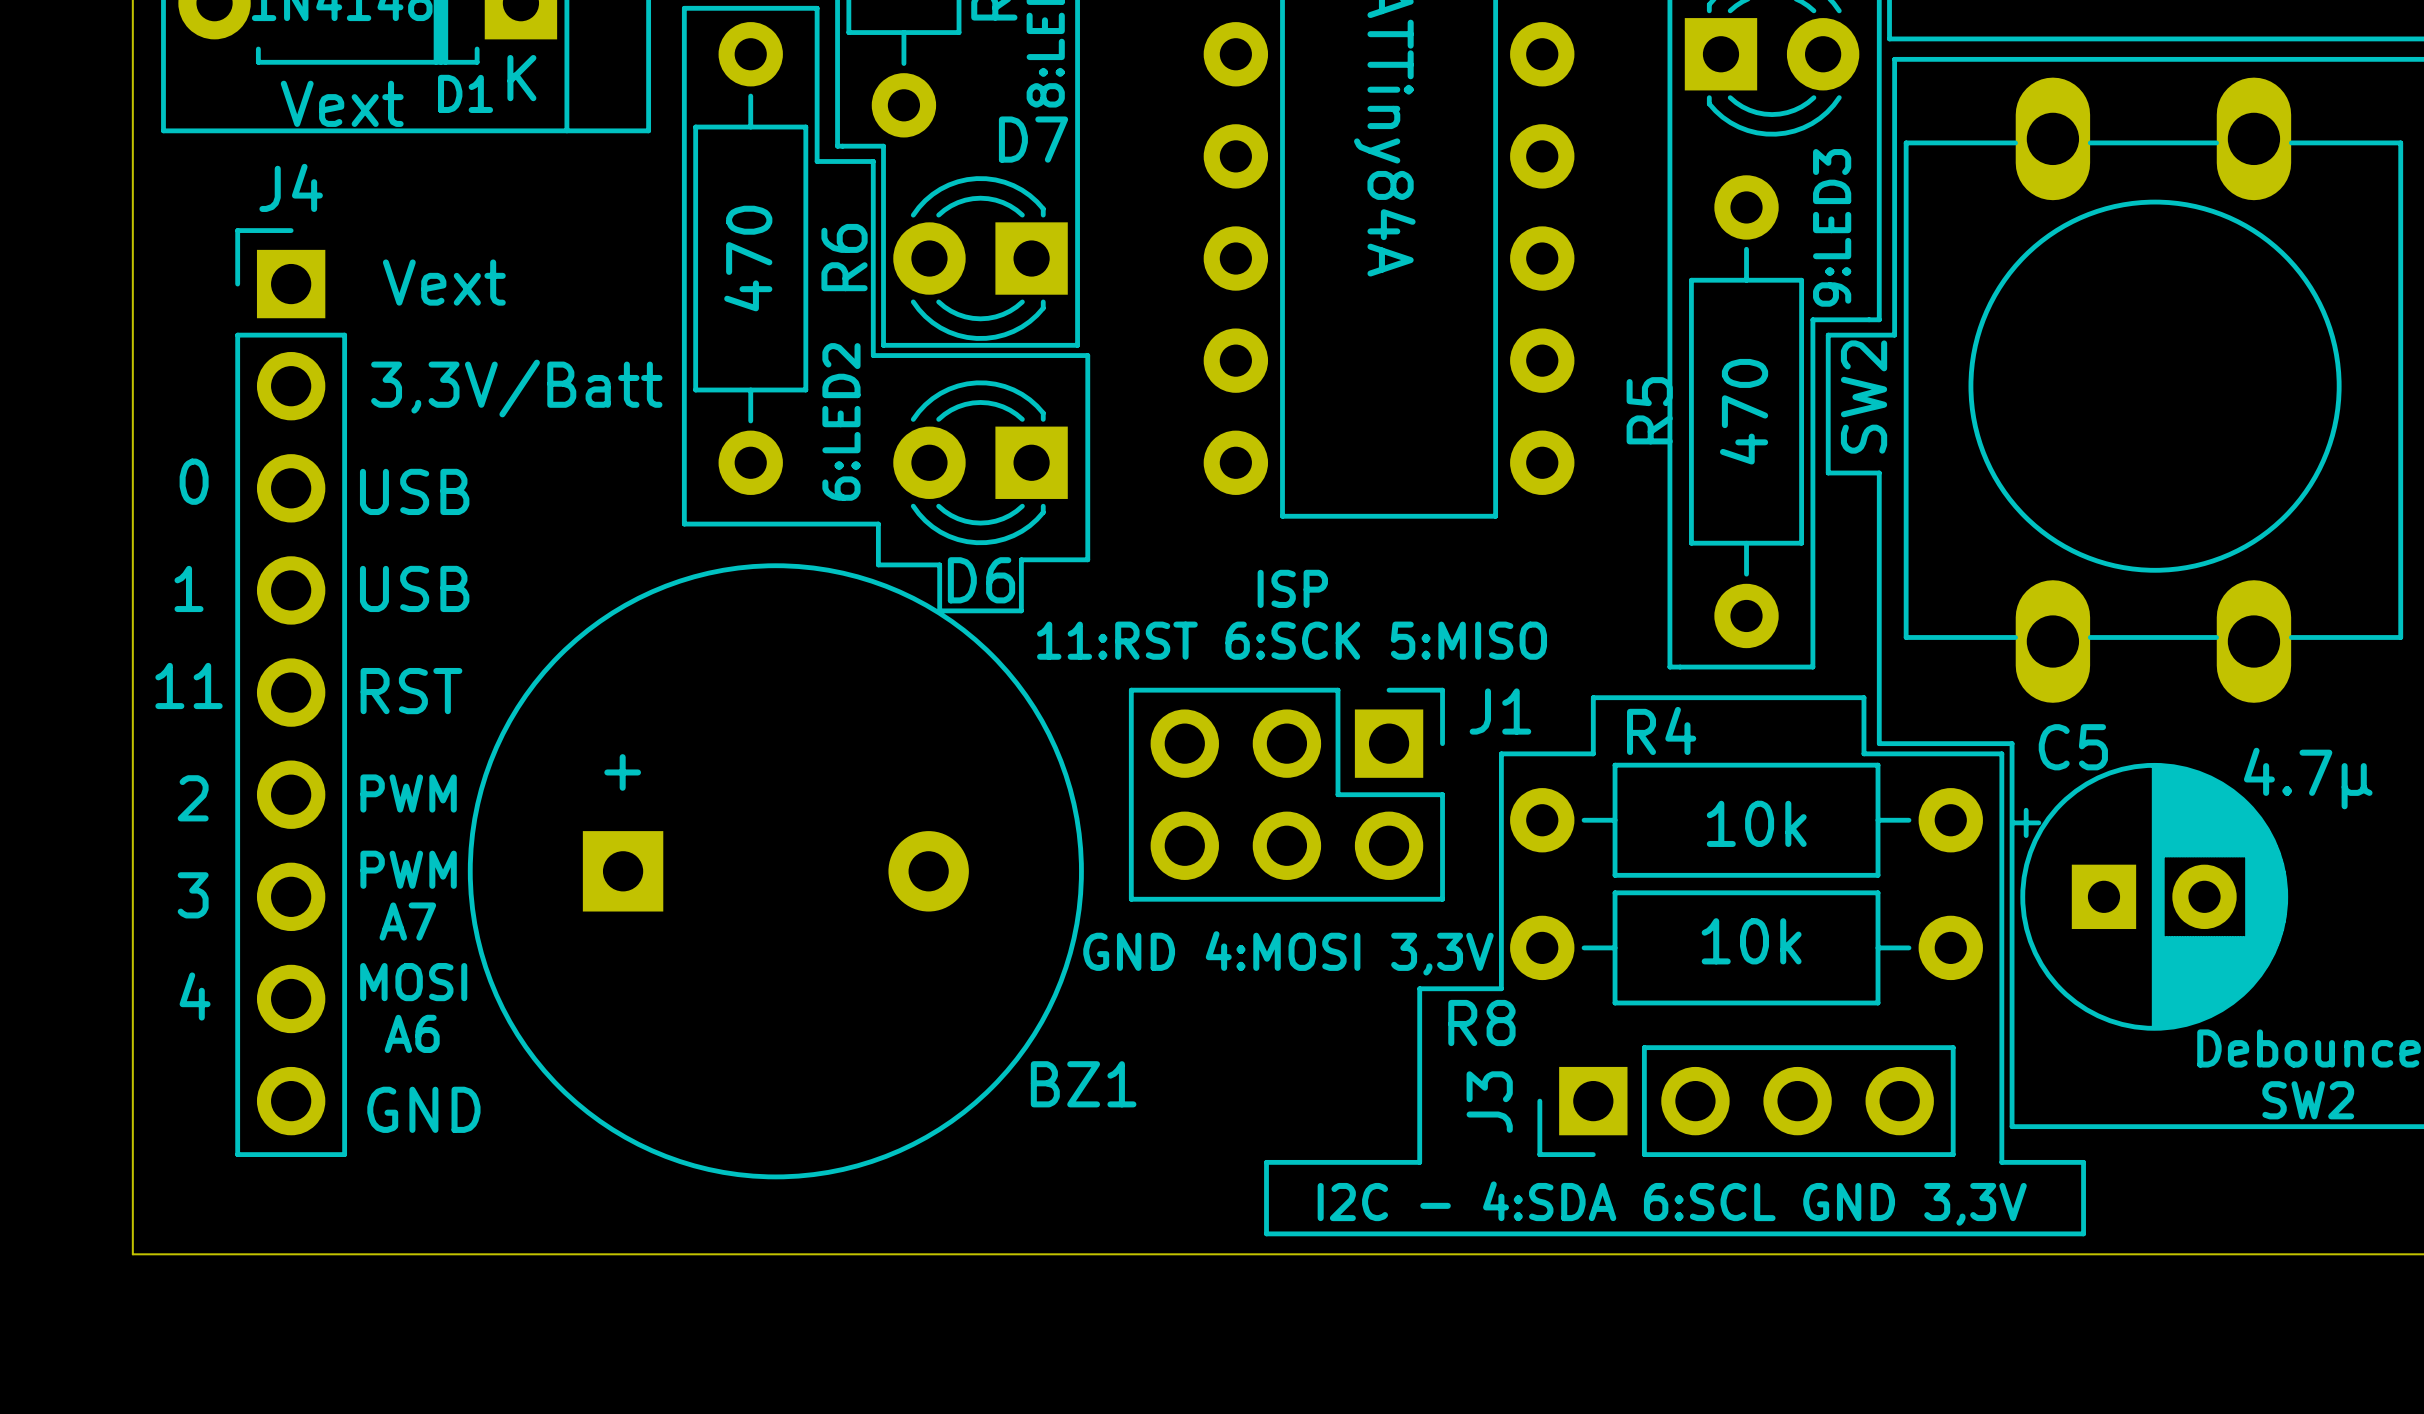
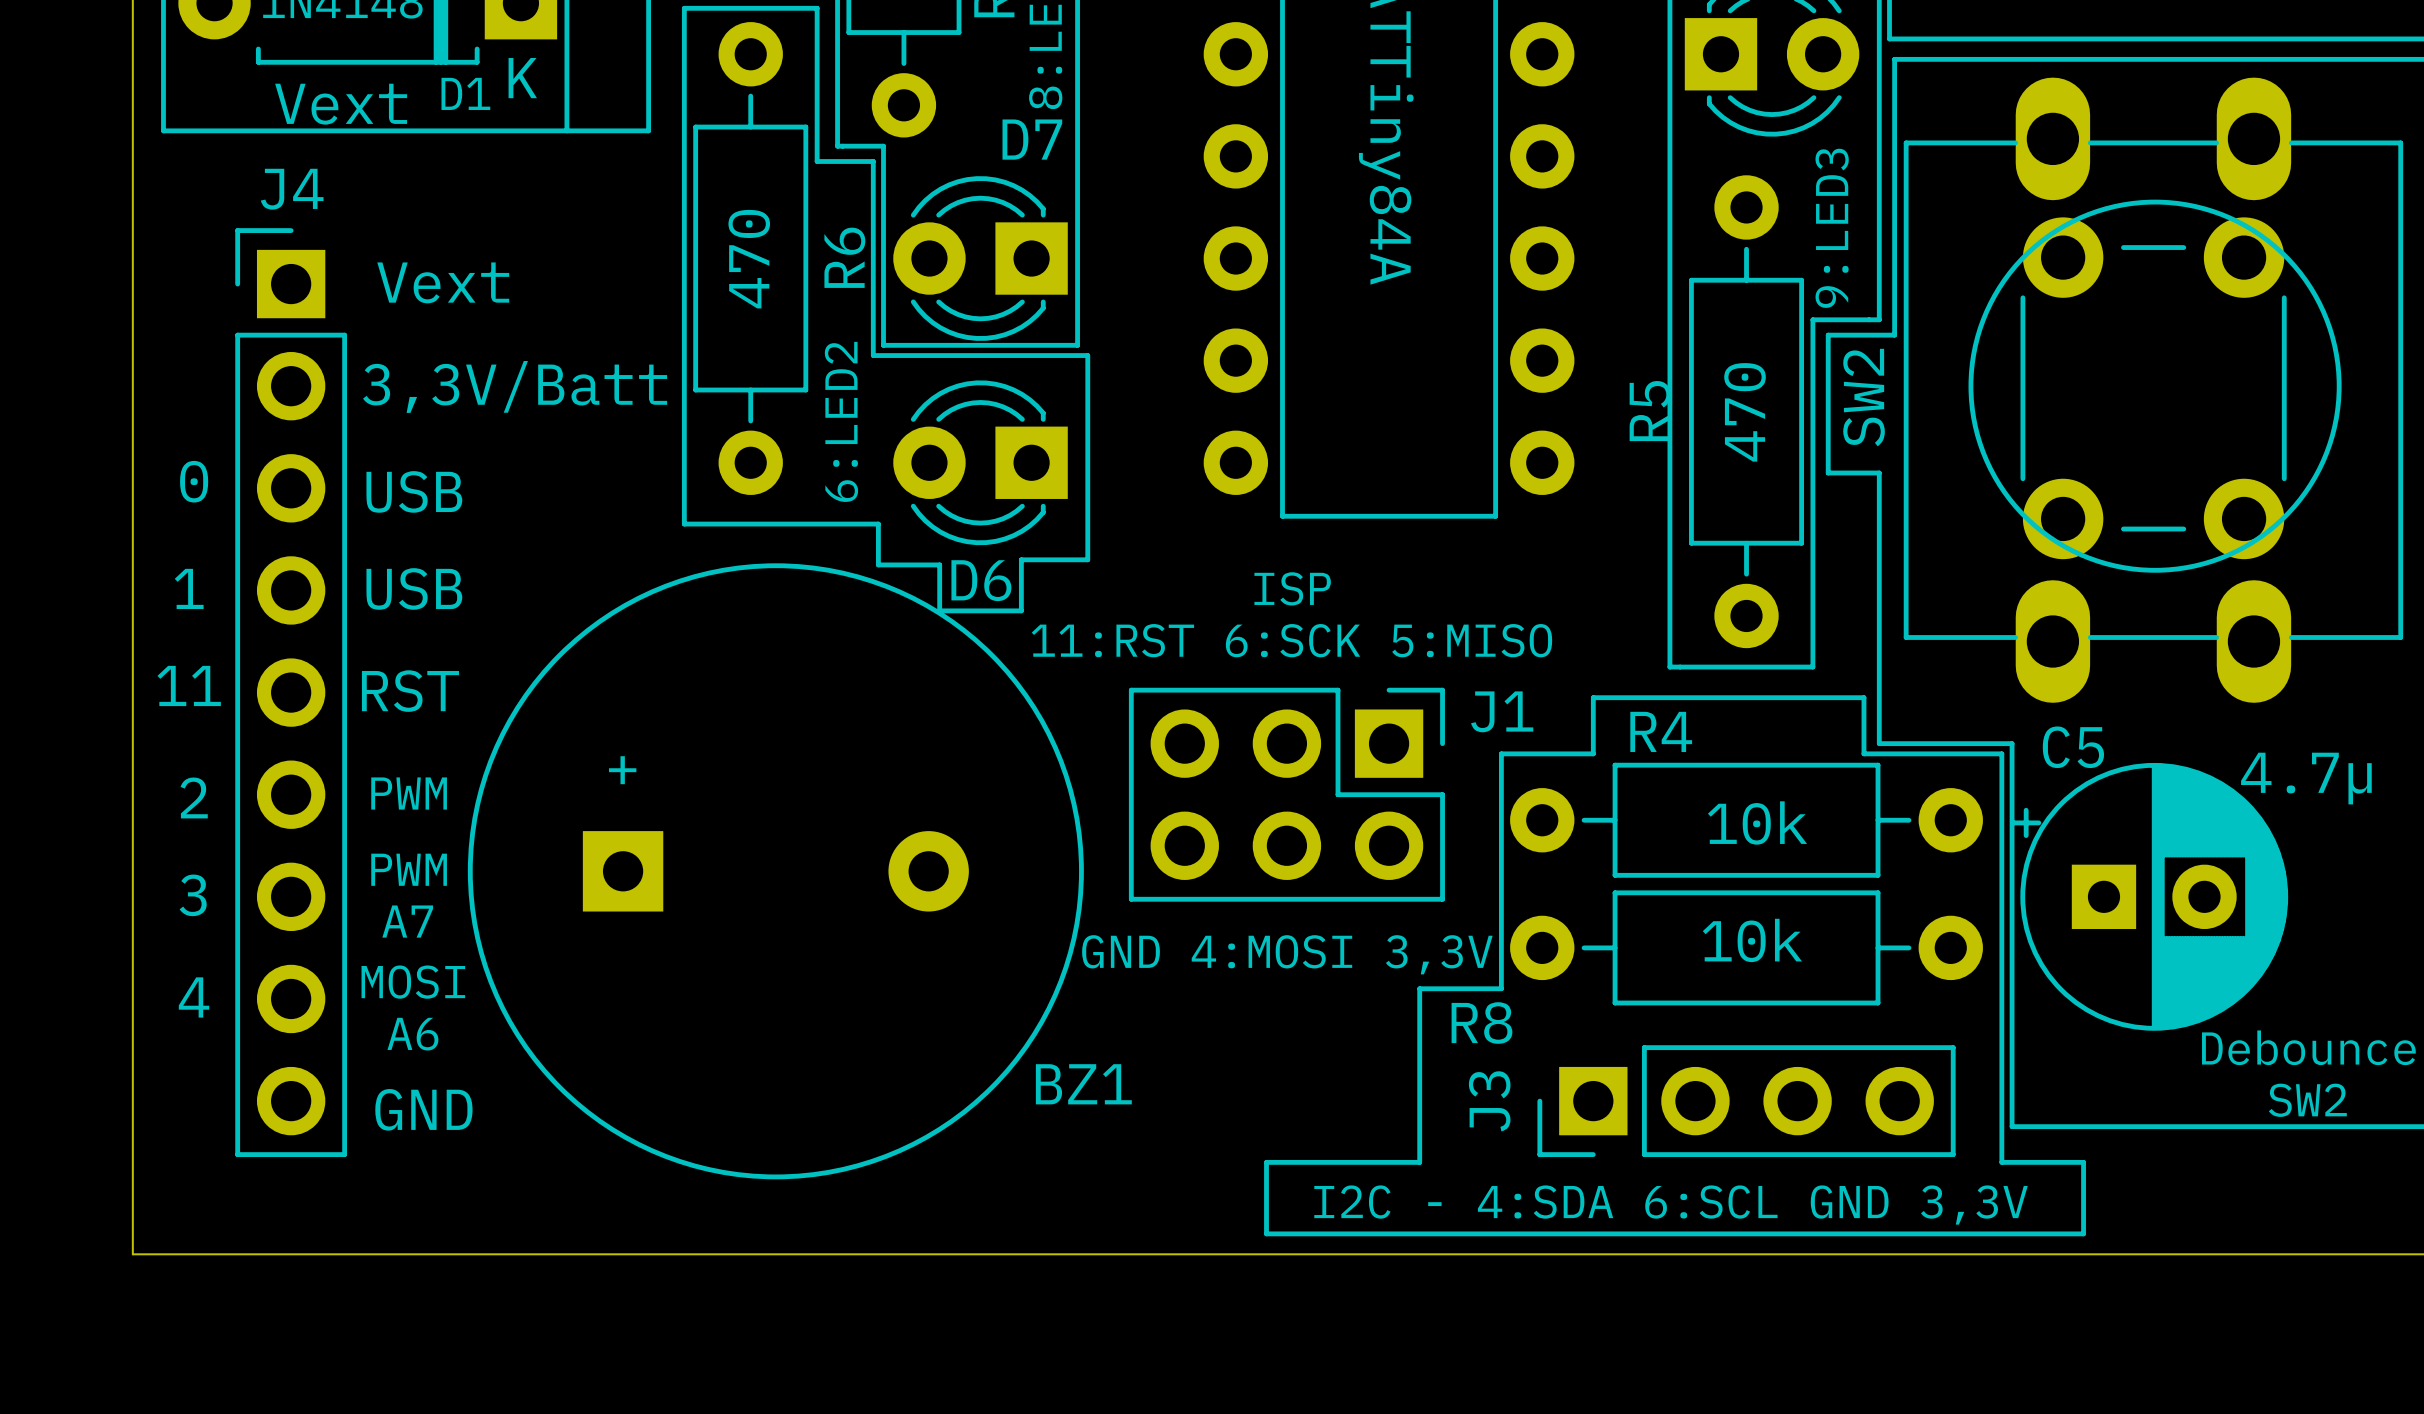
part: none -> (2153, 388)

